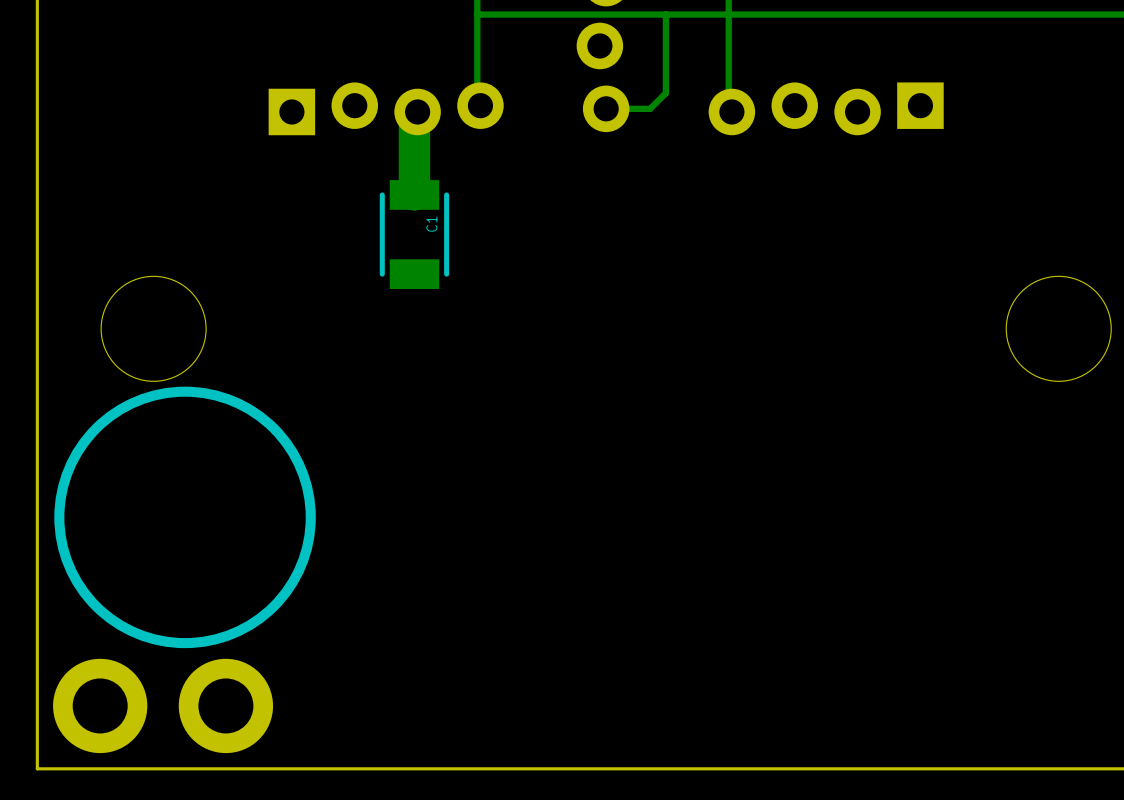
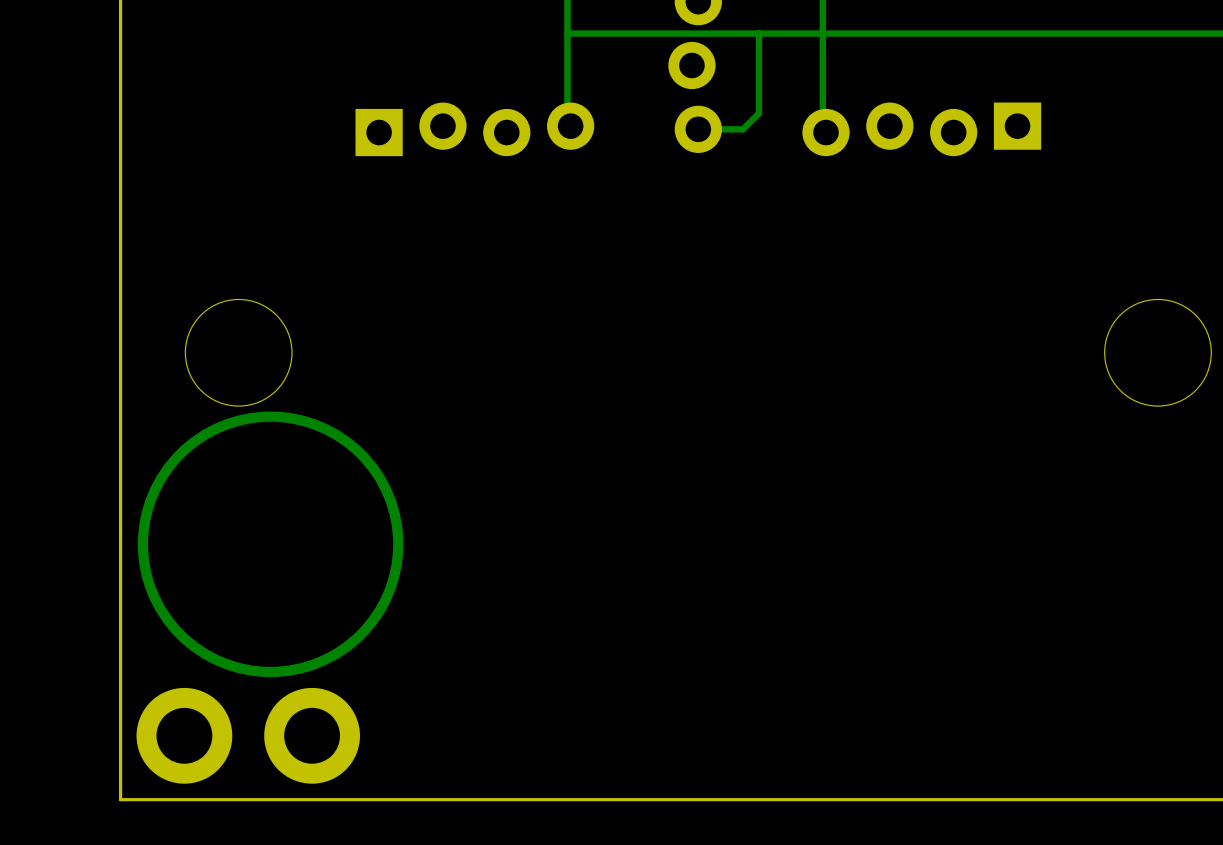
track: (417, 111) (414, 115) (414, 194) -> none
C1: (414, 234) -> none
drawing shape: [54, 386, 316, 649] -> [137, 411, 404, 678]

